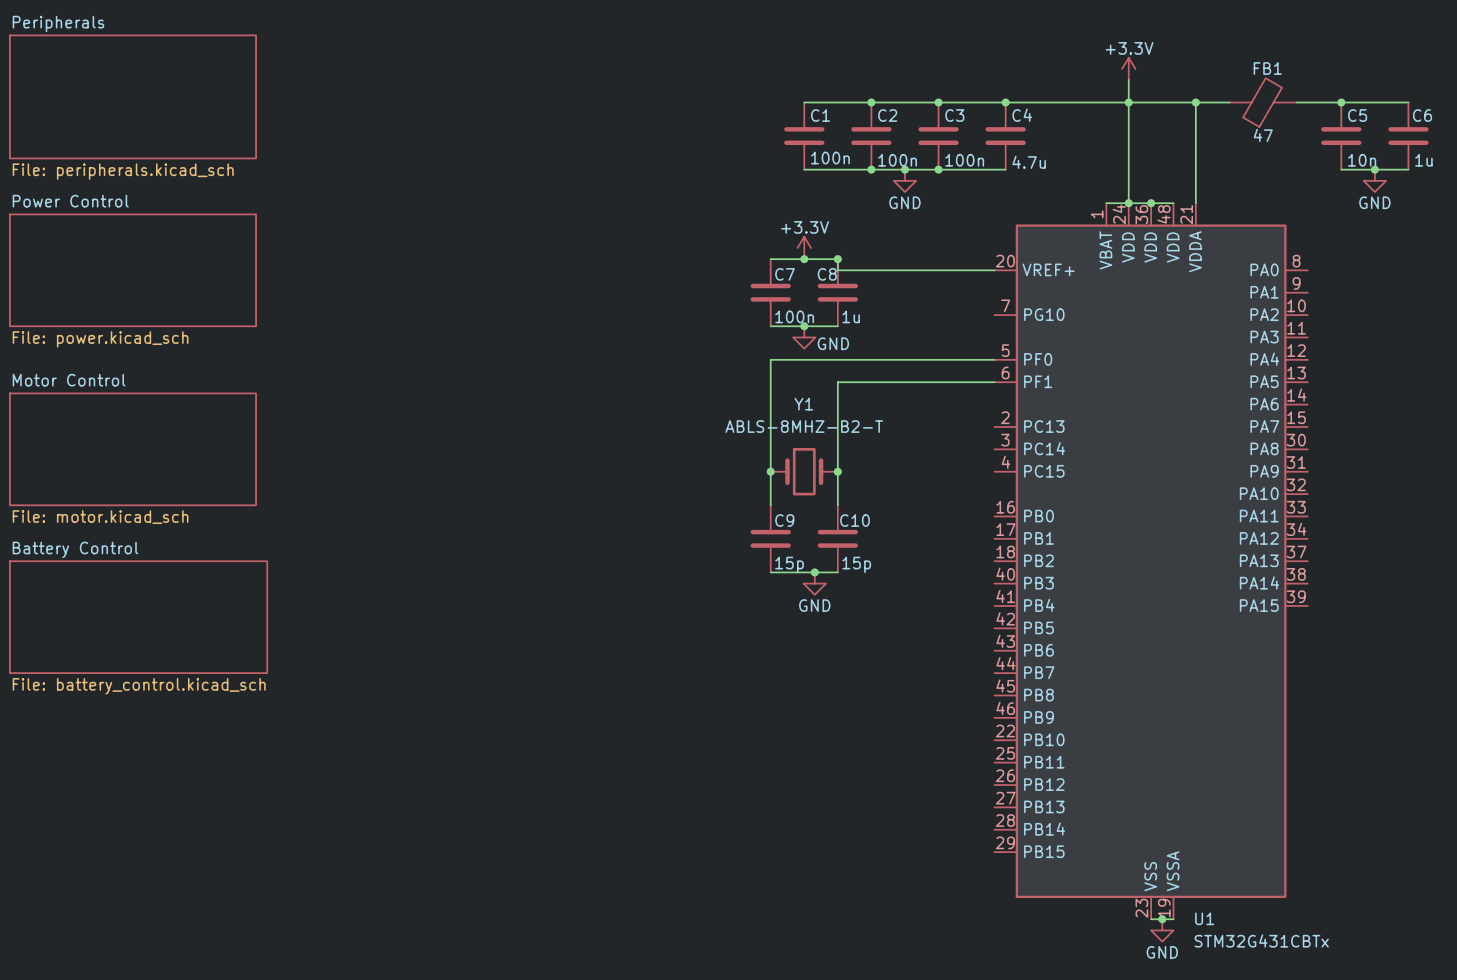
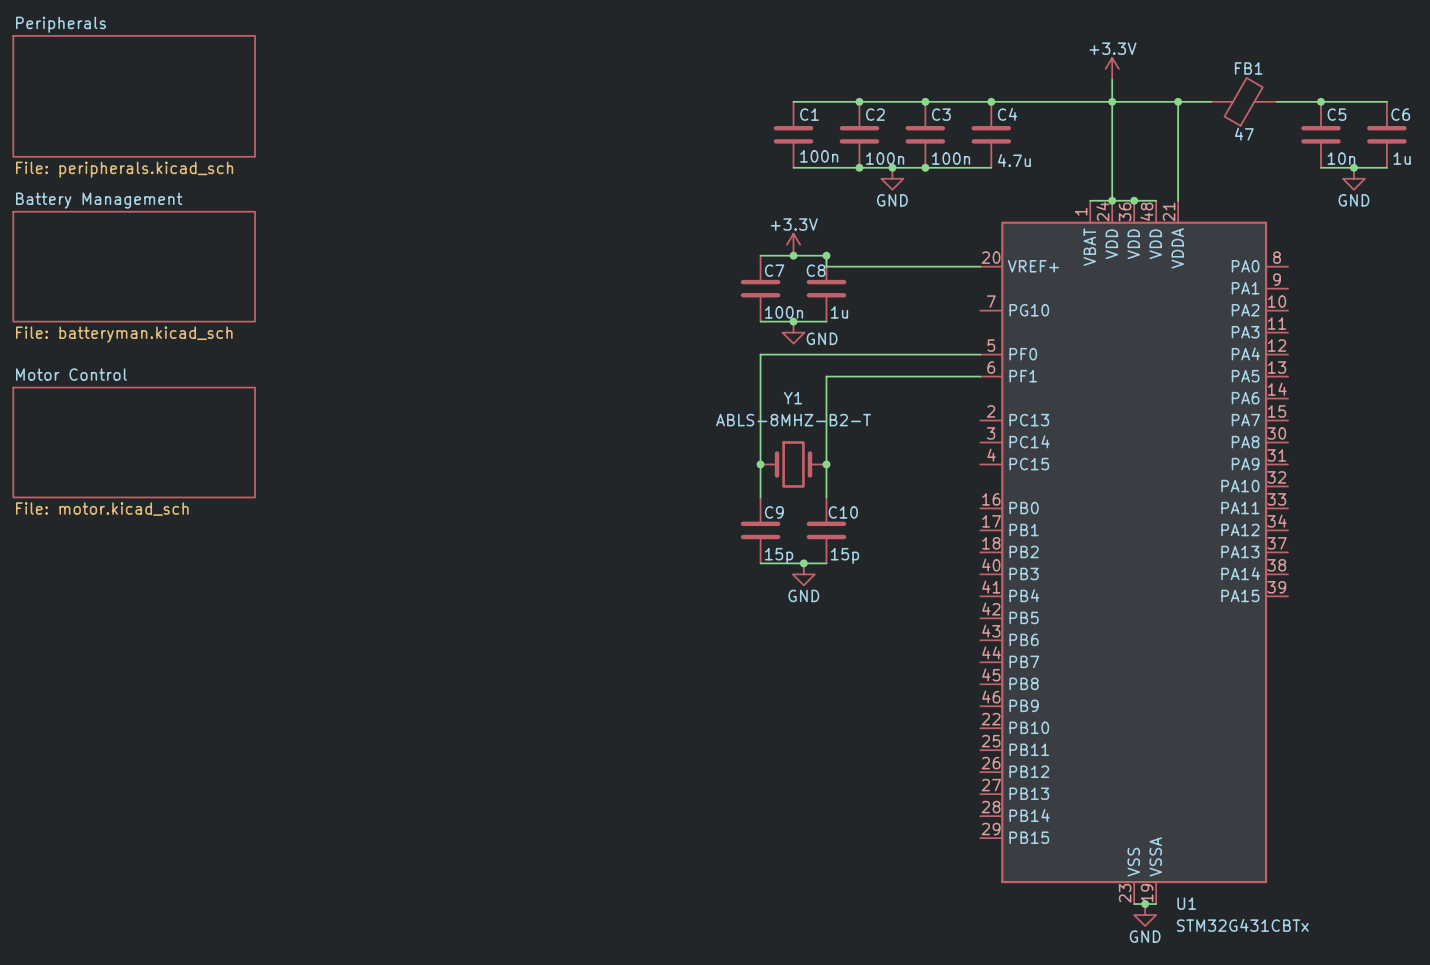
sheet Power Control name: Power Control (70, 201) -> Battery Management (99, 200)
sheet Power Control value: File: power.kicad_sch (100, 339) -> File: batteryman.kicad_sch (124, 334)
sheet Battery Control: File: battery_control.kicad_sch (138, 617) -> none

